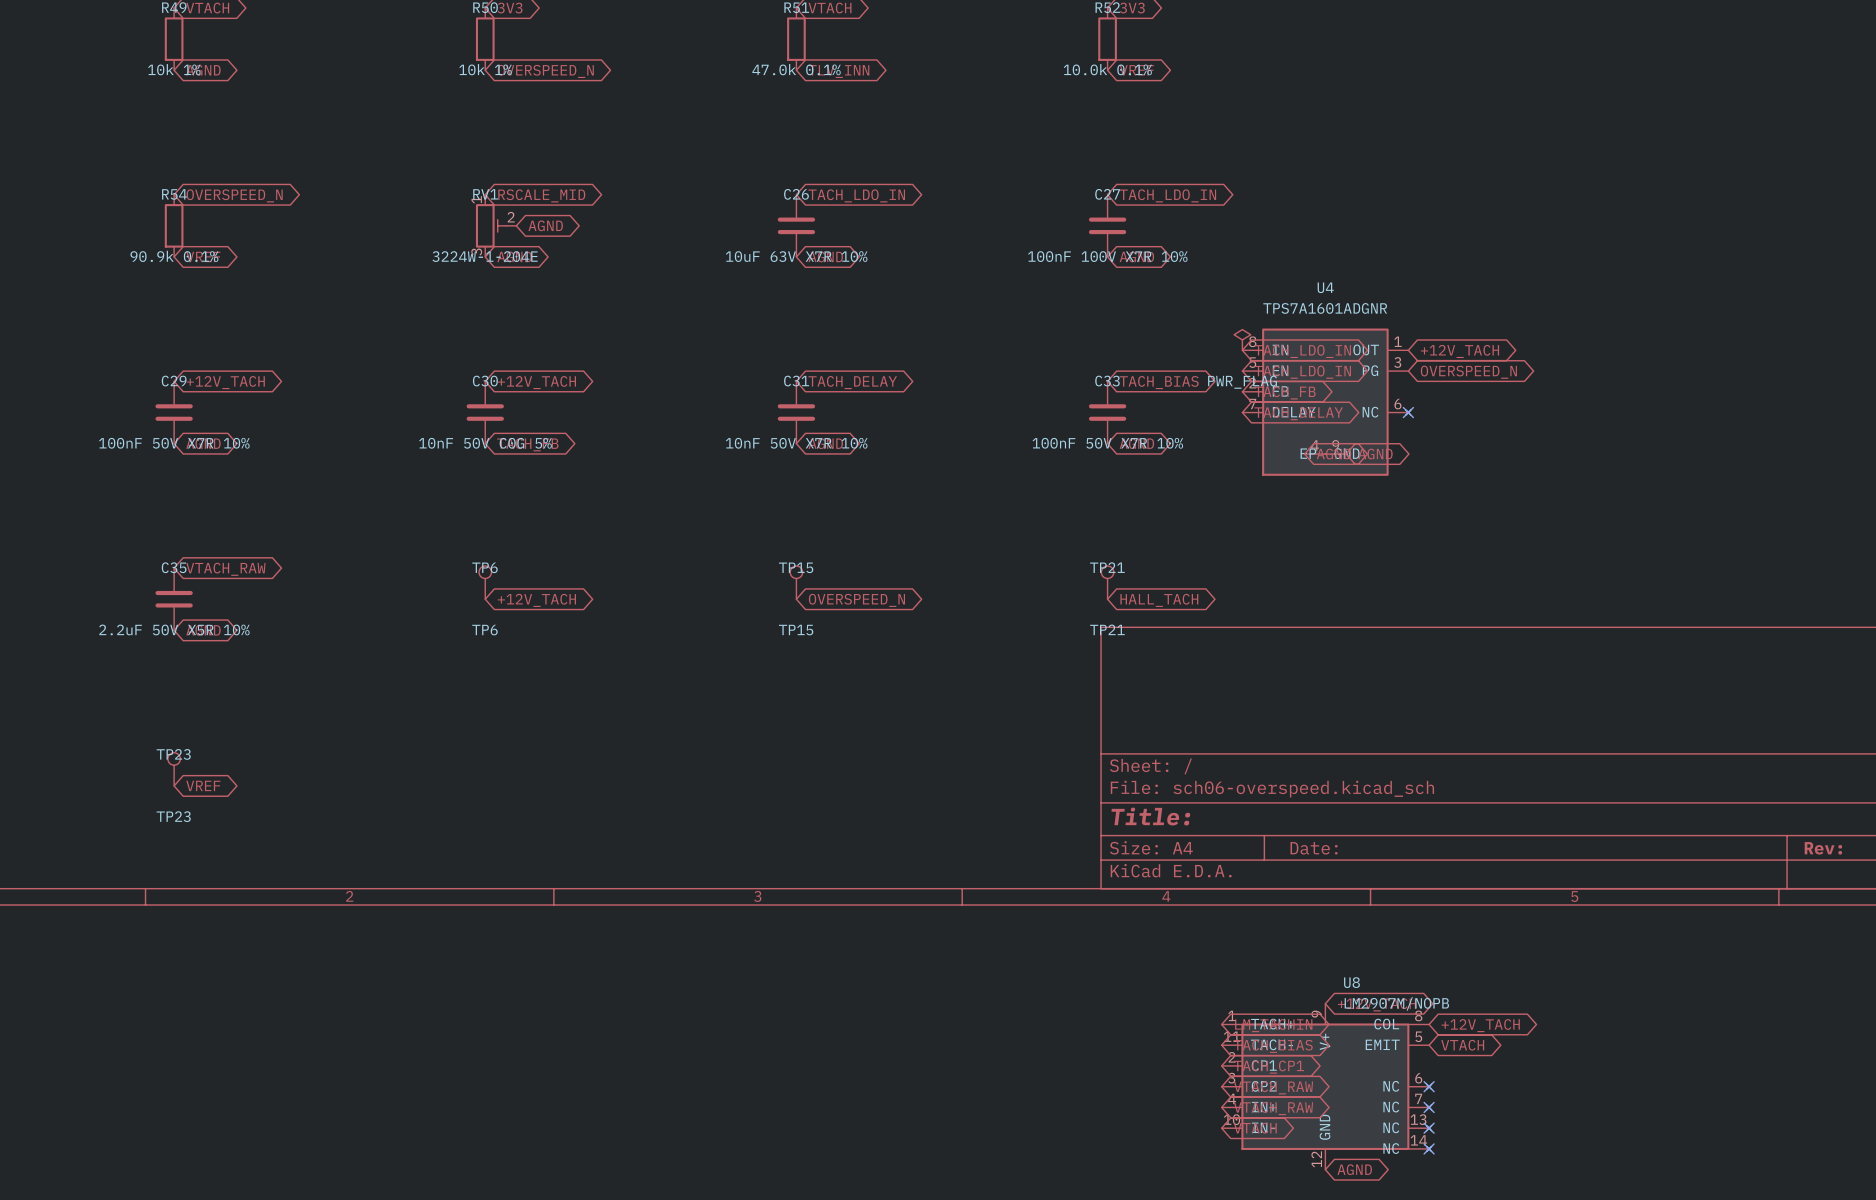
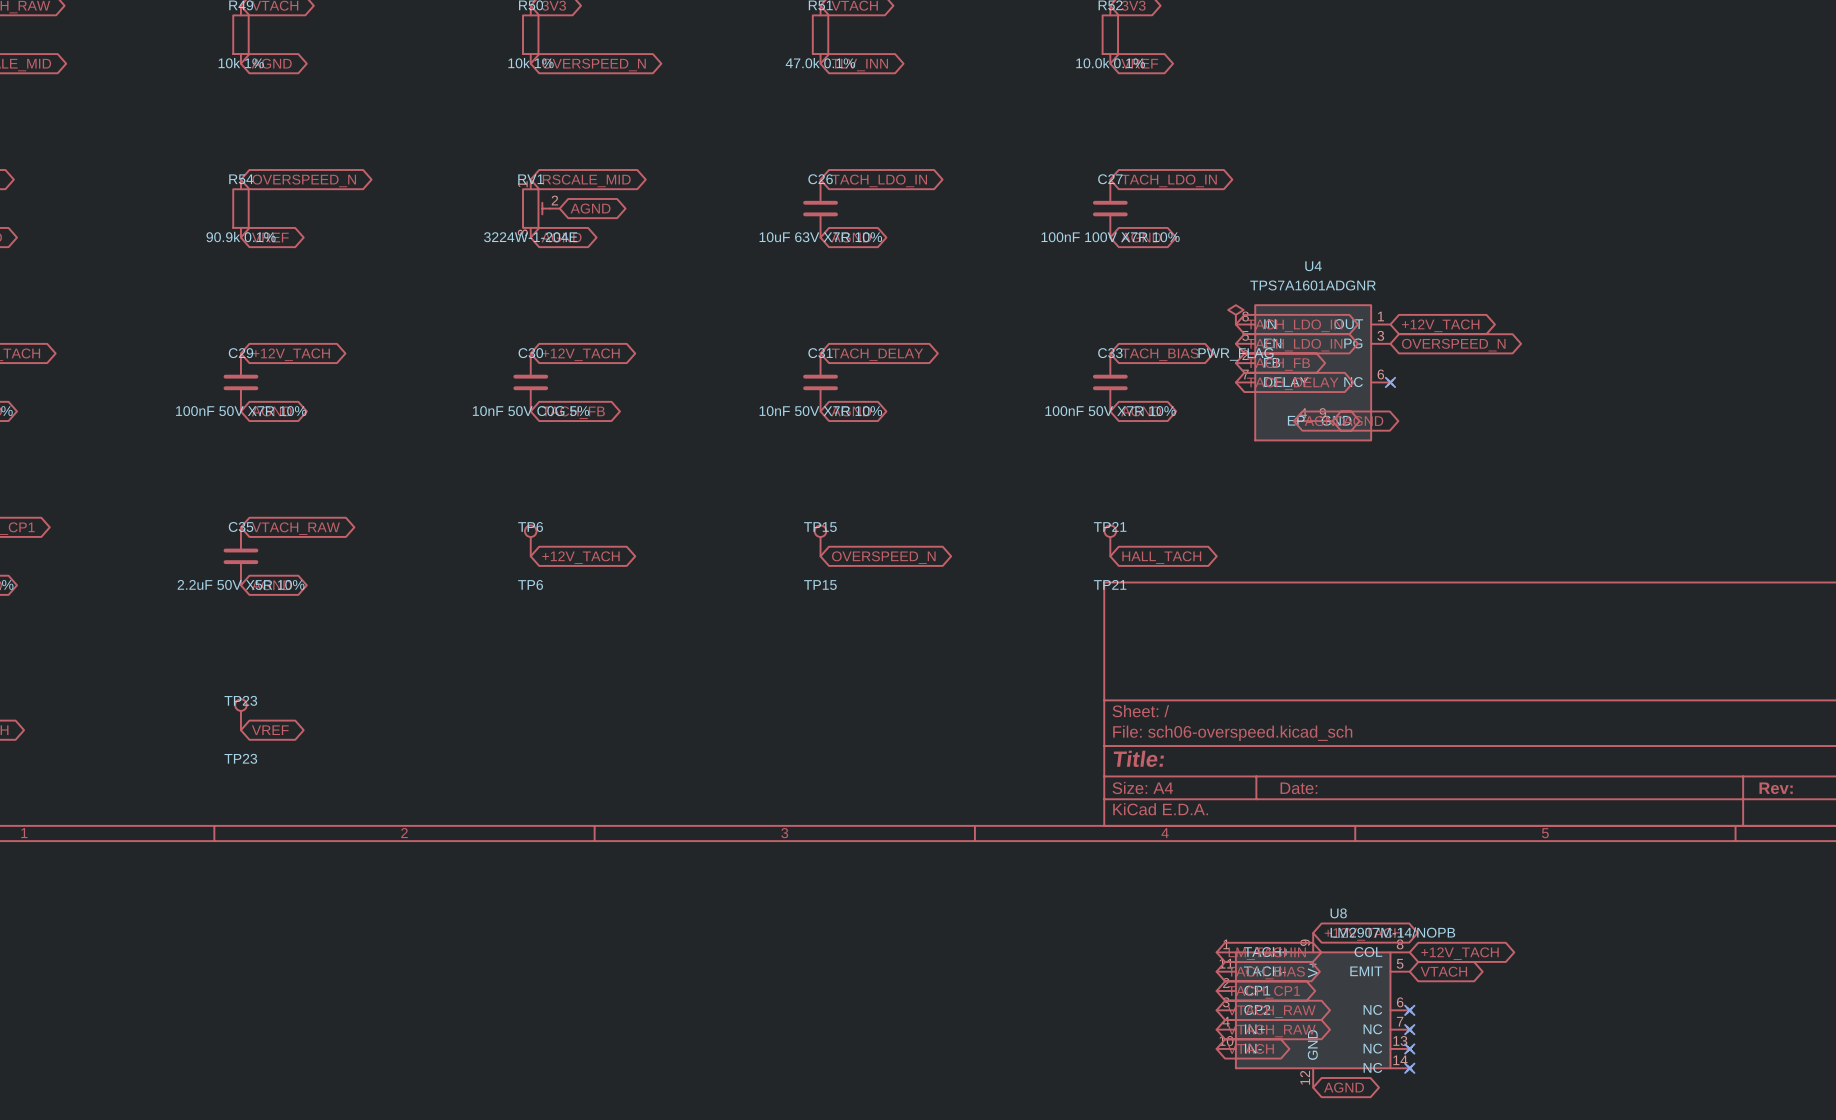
U8 value: LM2907M/NOPB (1396, 1003) -> LM2907M-14/NOPB (1392, 932)

